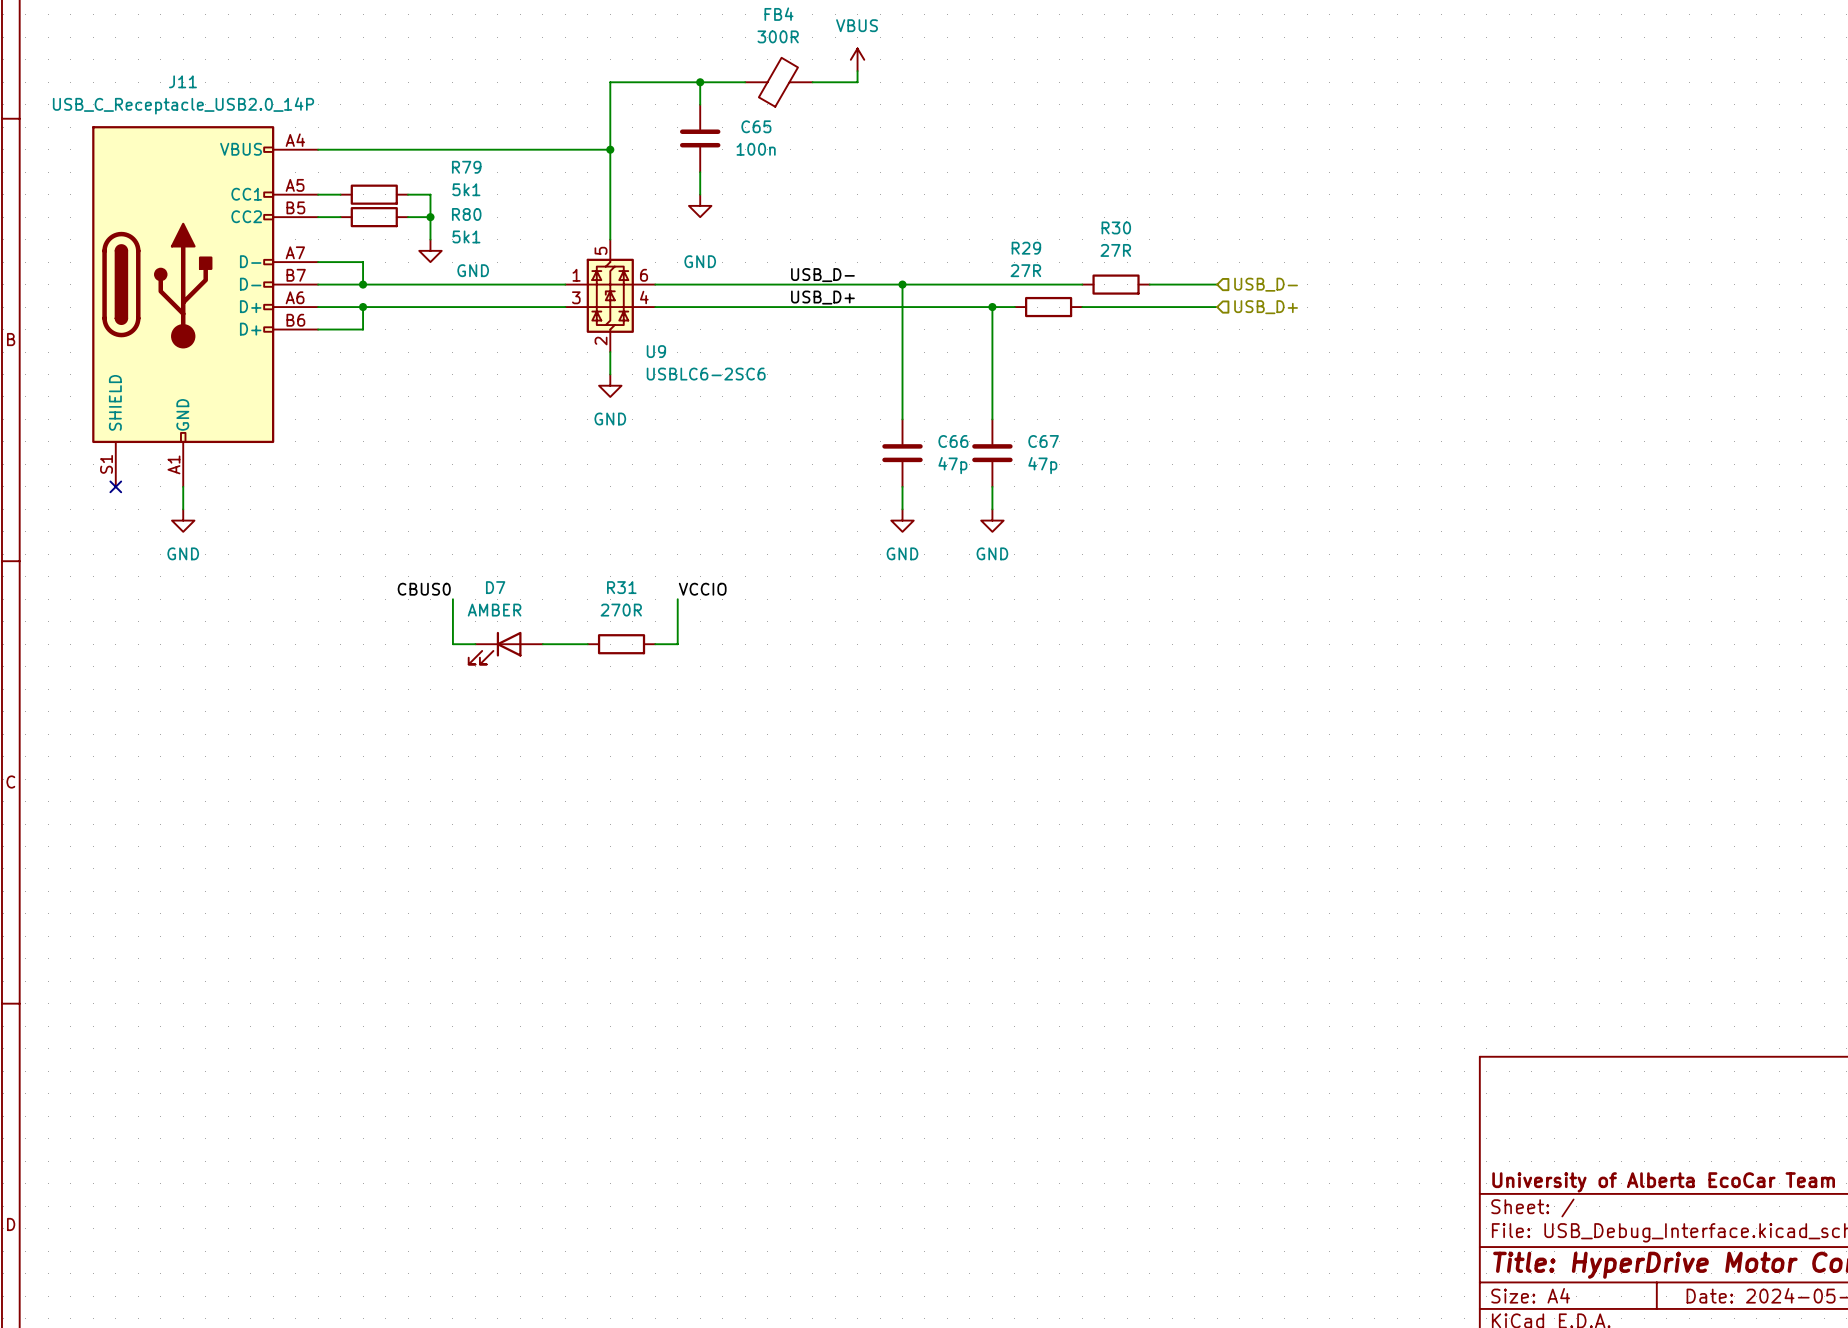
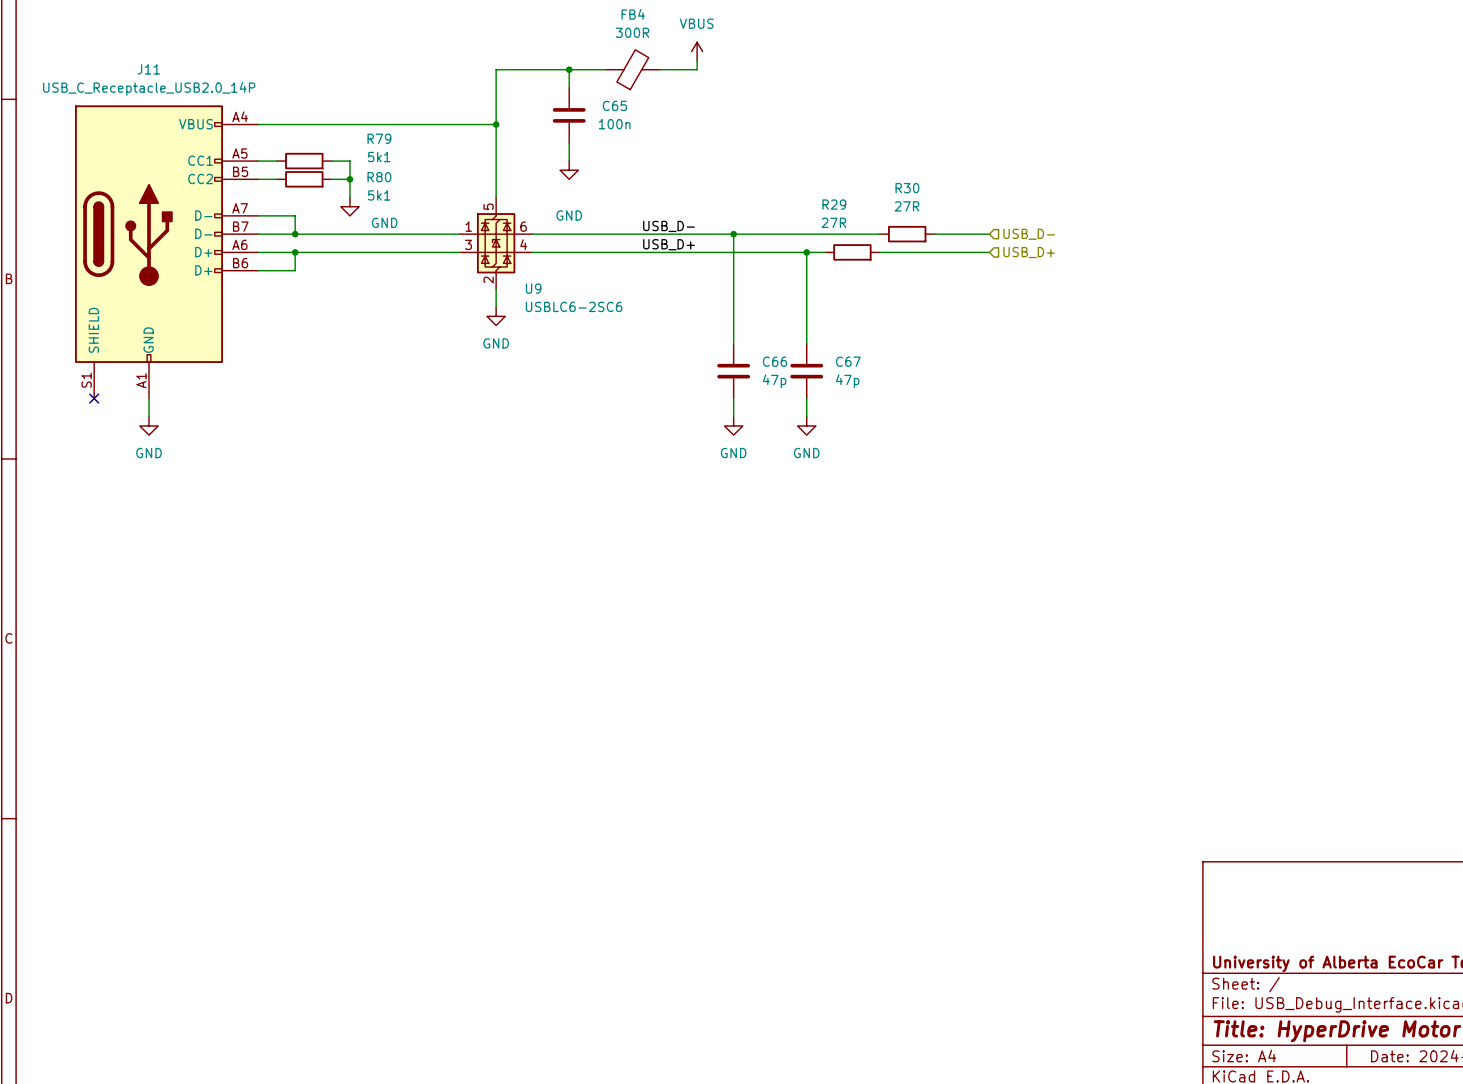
label: CBUS0 (424, 589) -> none
label: VCCIO (702, 589) -> none
wire: (452, 599) (452, 644) (475, 644) -> none
wire: (677, 599) (677, 644) (655, 644) -> none
wire: (542, 644) (587, 644) -> none
R31: 270R (621, 644) -> none
D7: AMBER (505, 648) -> none

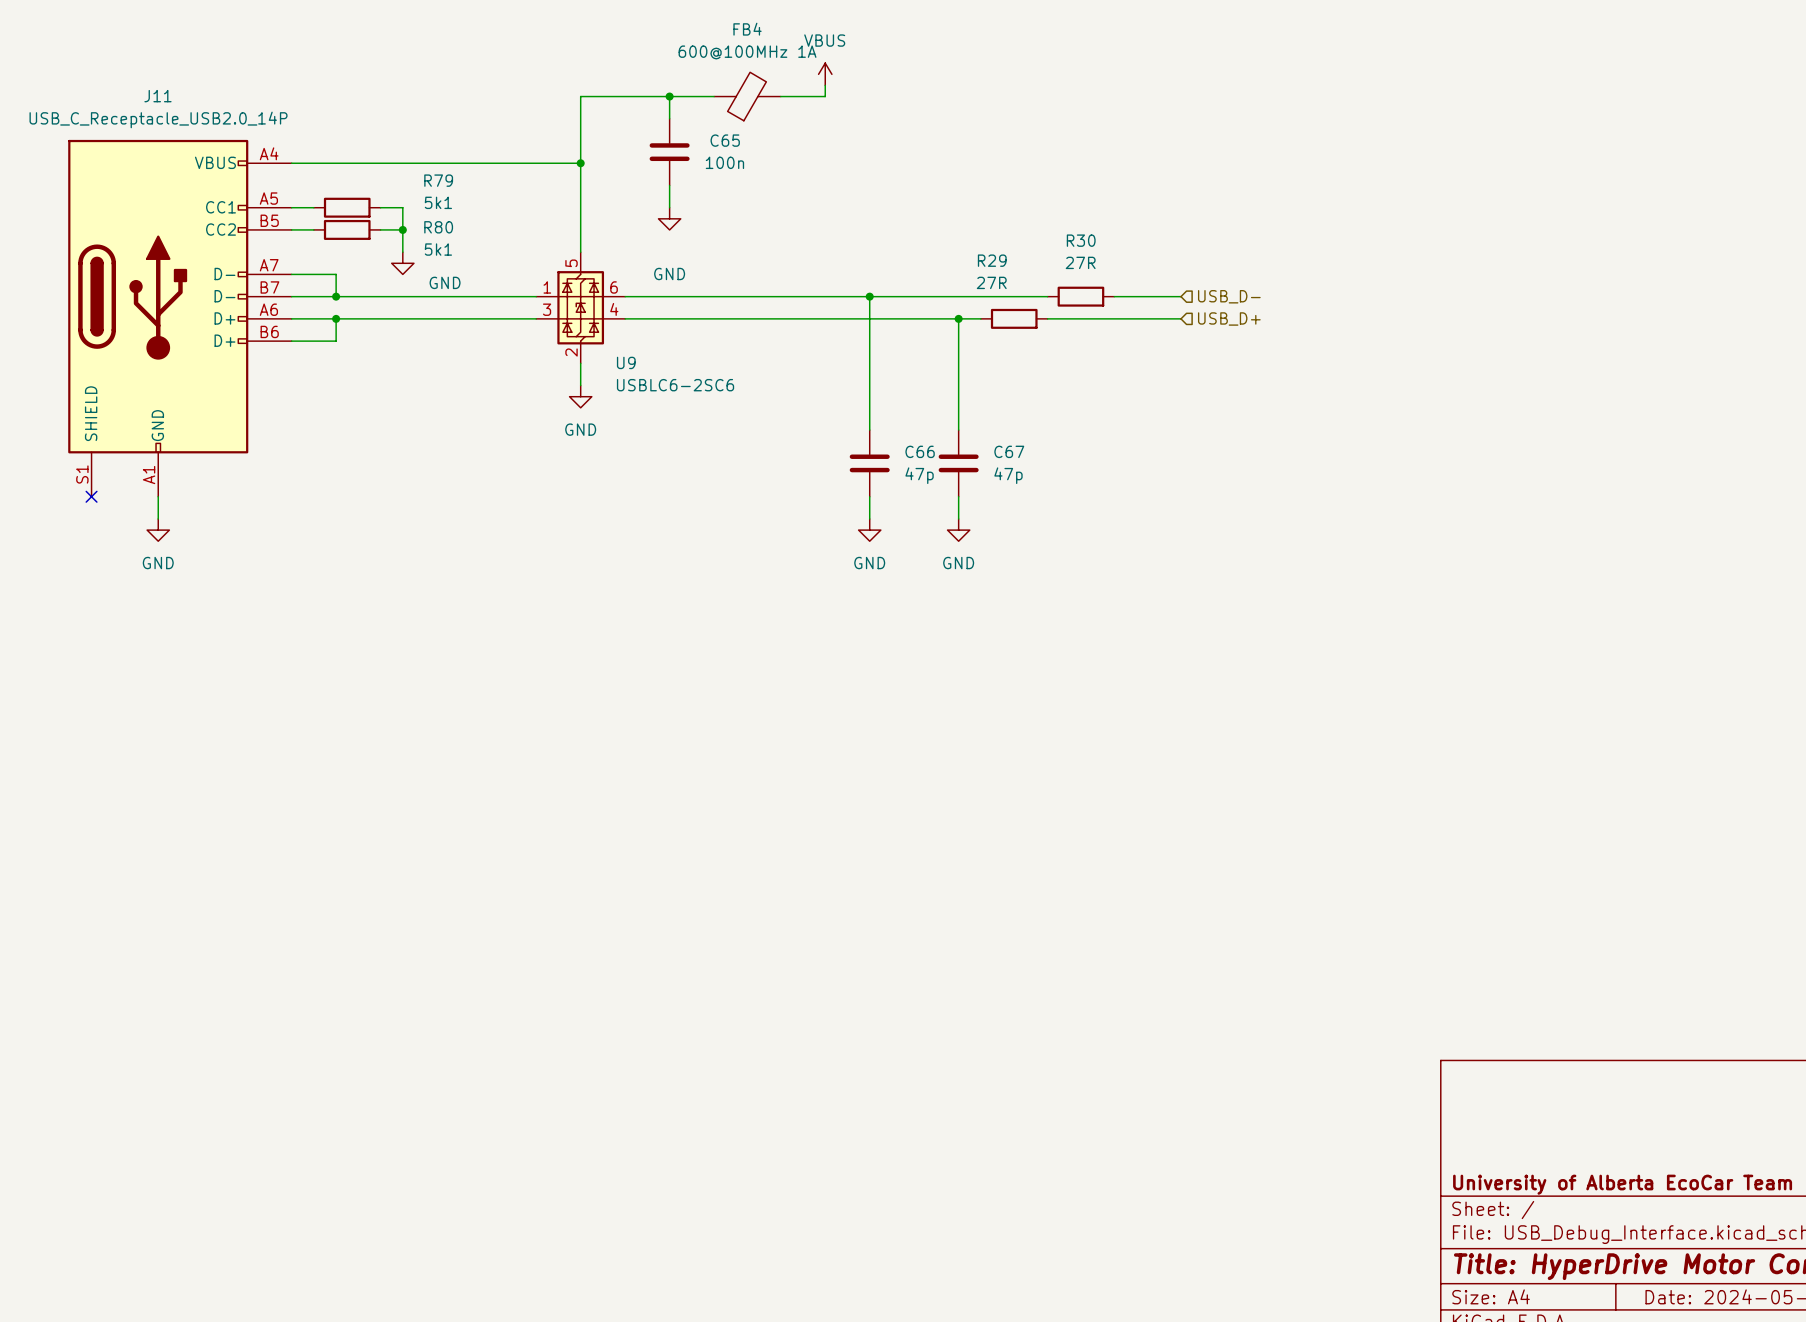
FB4 value: 300R (632, 32) -> 600@100MHz 1A (747, 52)
label: USB_D- (668, 226) -> none
label: USB_D+ (668, 244) -> none

